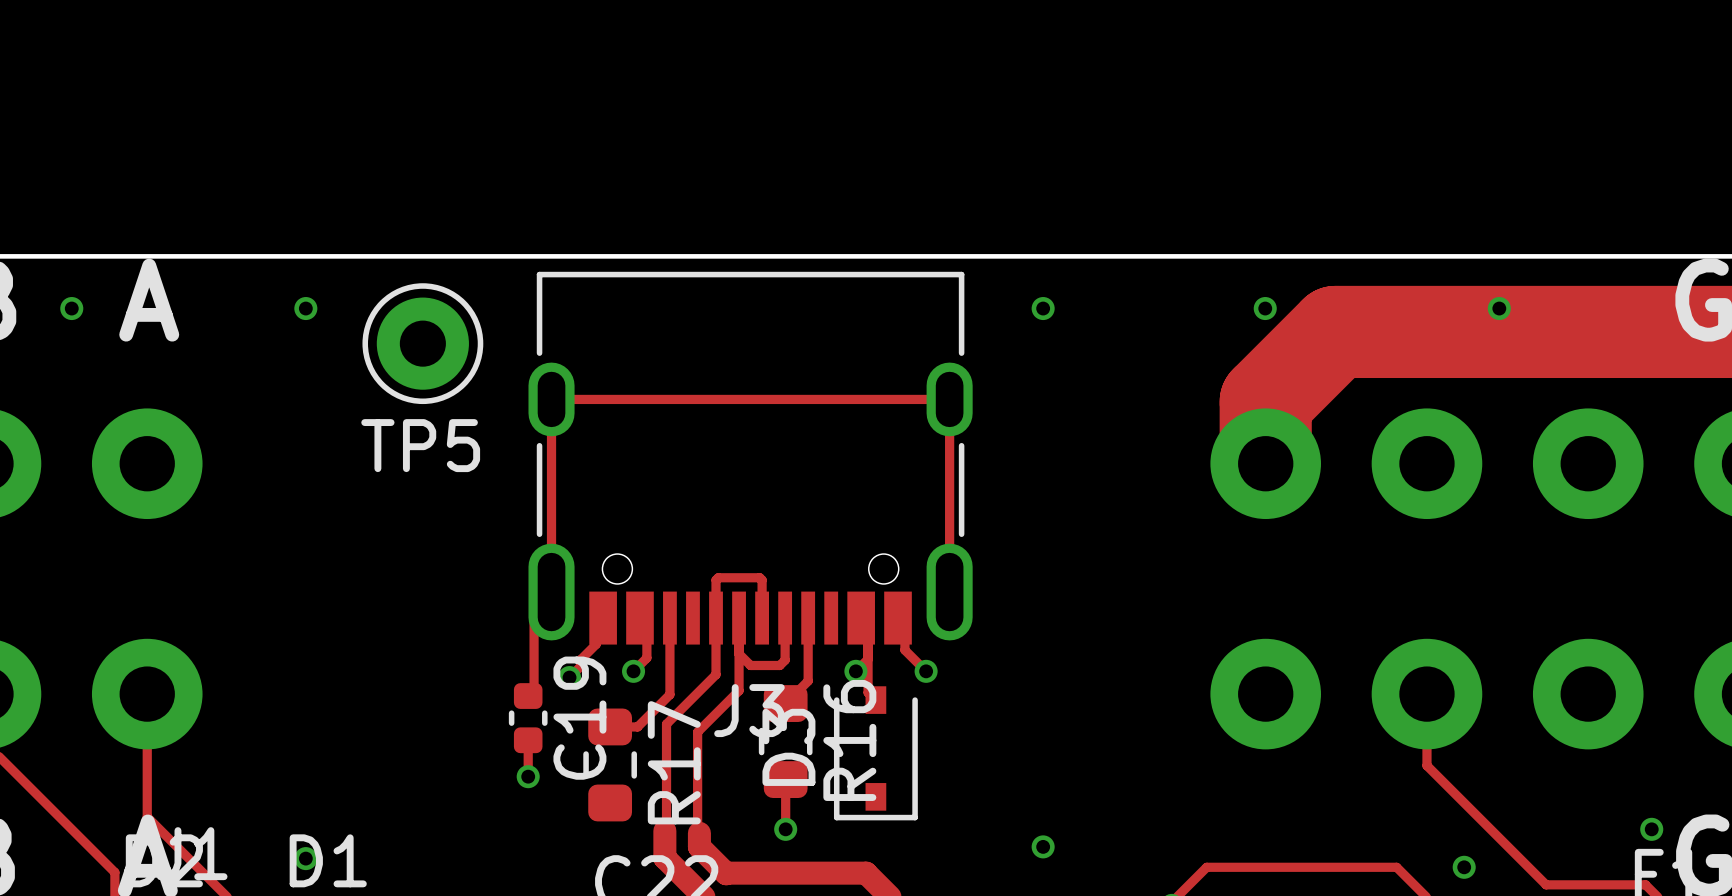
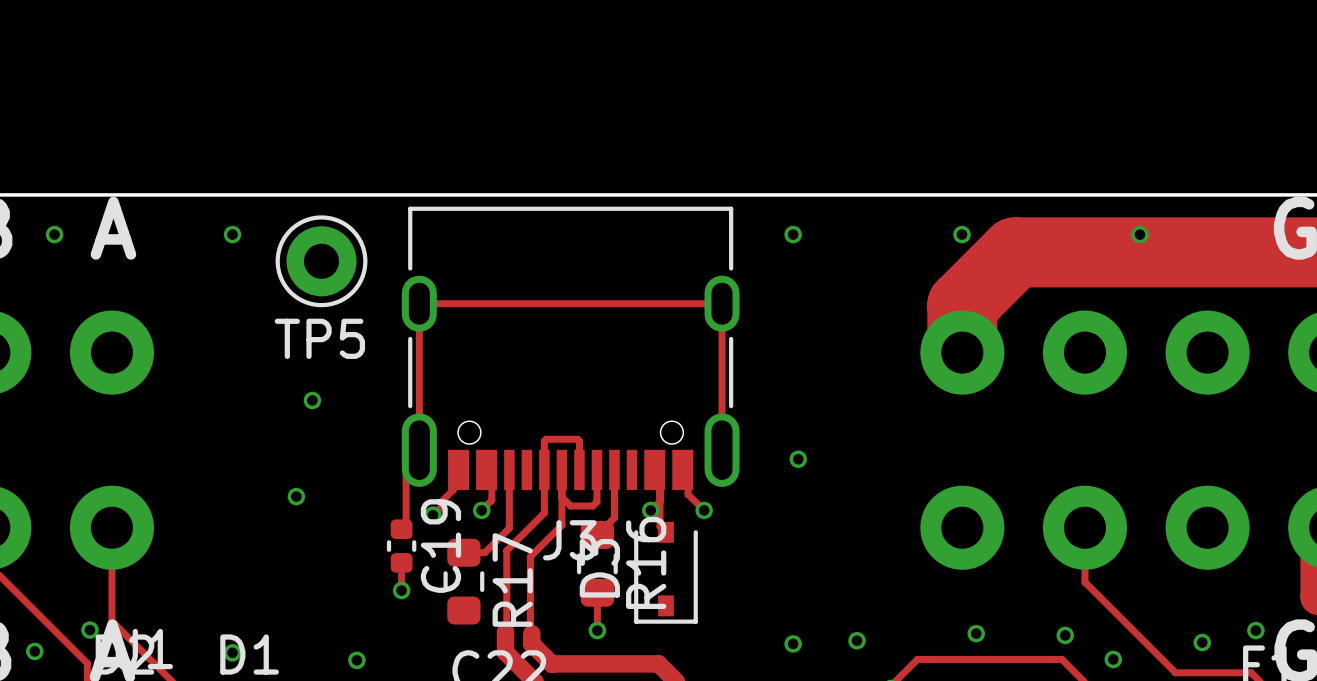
via: none -> (312, 400)
via: none -> (798, 459)
via: none -> (296, 496)
via: none -> (89, 630)
via: none -> (976, 633)
via: none -> (1065, 635)
via: none -> (857, 640)
via: none -> (1202, 642)
via: none -> (34, 651)
via: none -> (356, 660)

